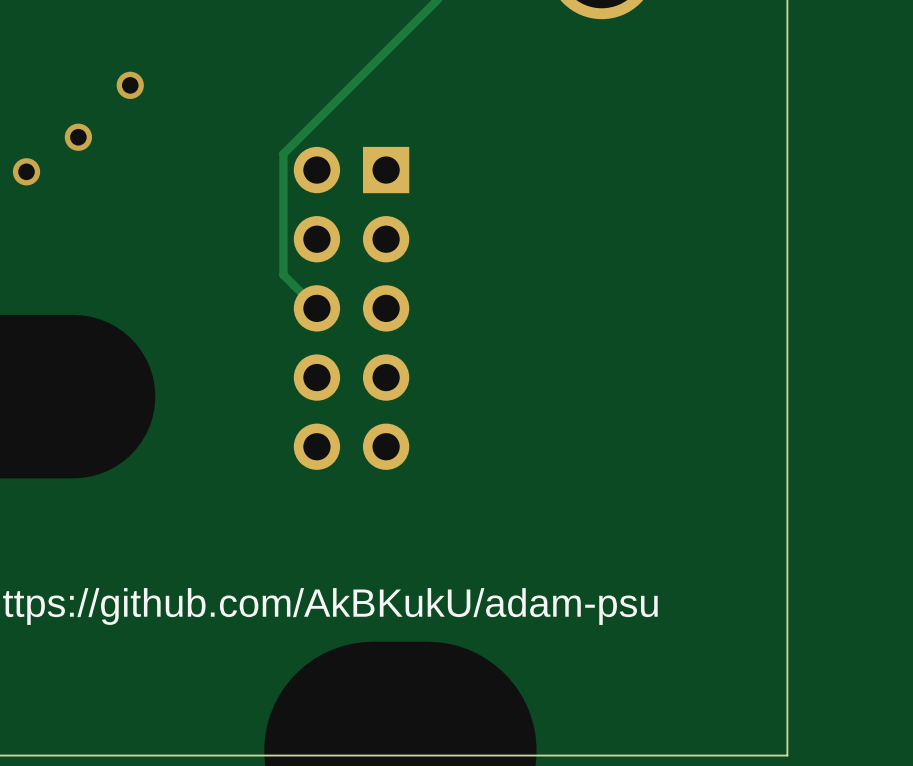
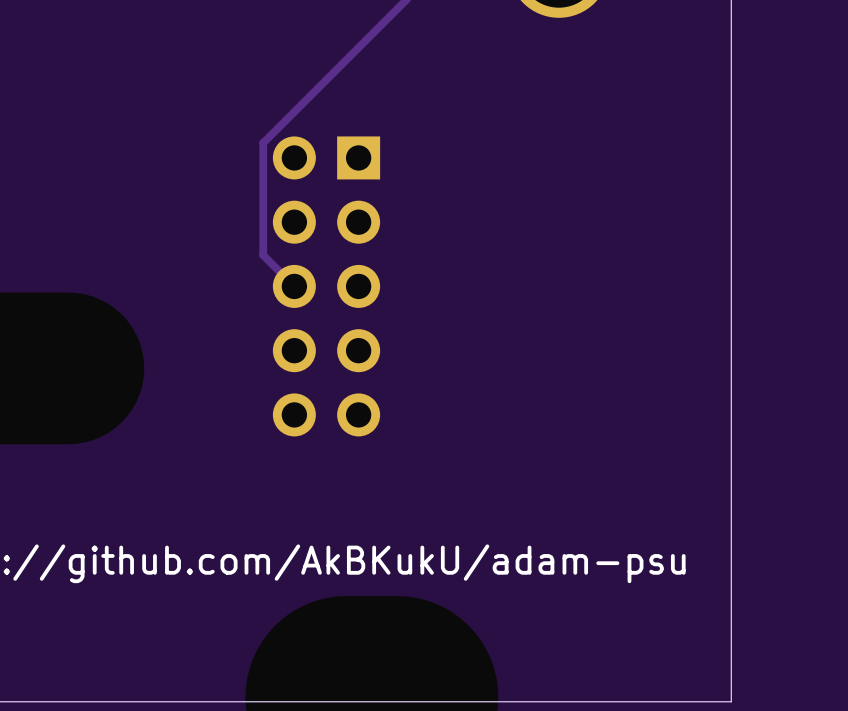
via: (130, 85) -> none
via: (78, 137) -> none
via: (26, 171) -> none

